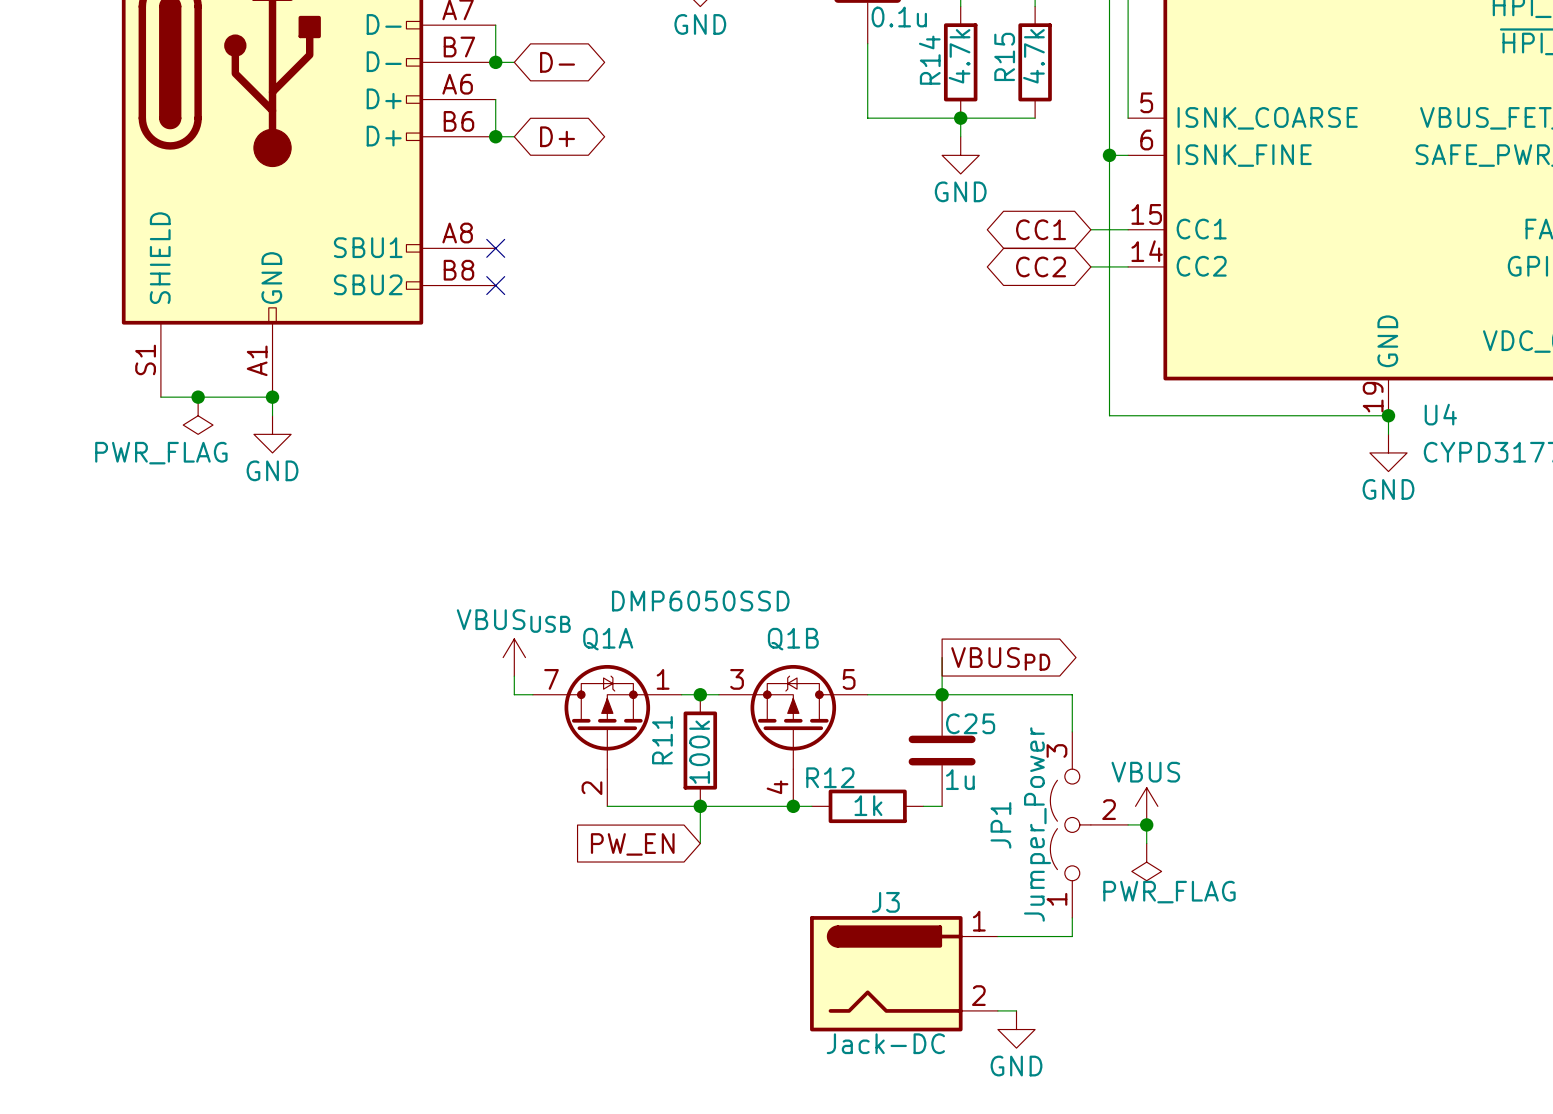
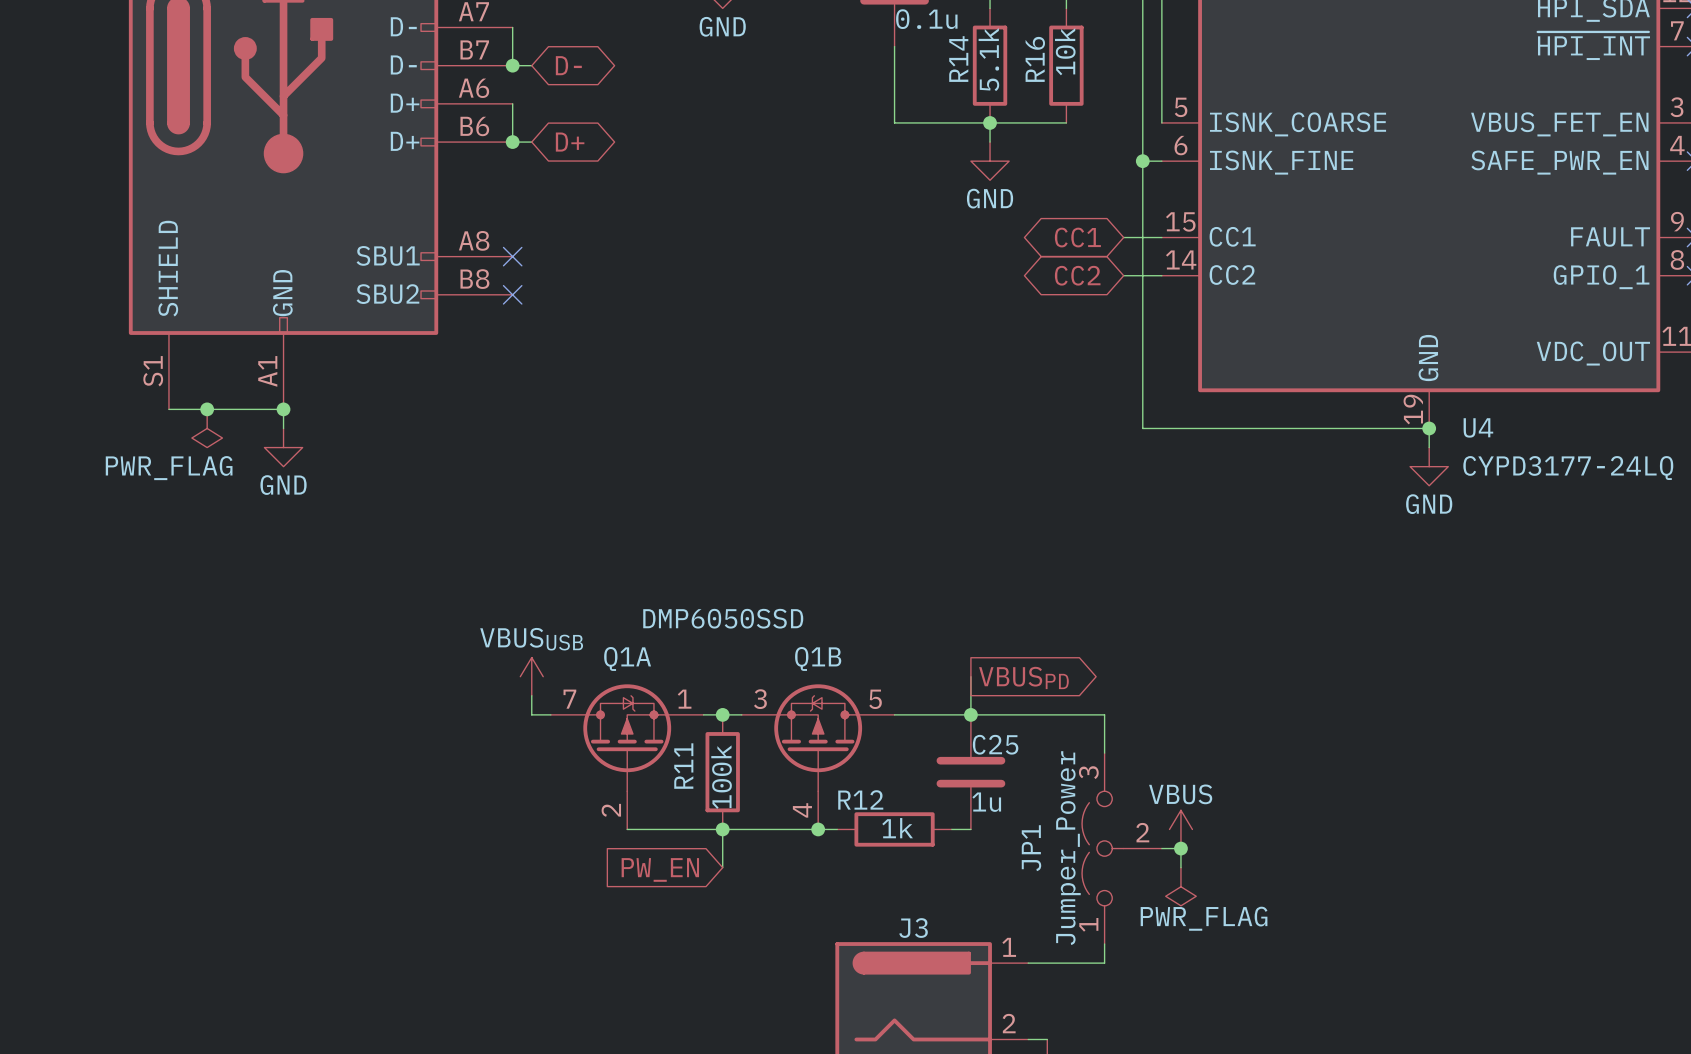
R14 value: 4.7k (959, 56) -> 5.1k (988, 59)
R15 name: R15 (1004, 56) -> R16 (1035, 59)
R15 value: 4.7k (1033, 56) -> 10k (1065, 51)

